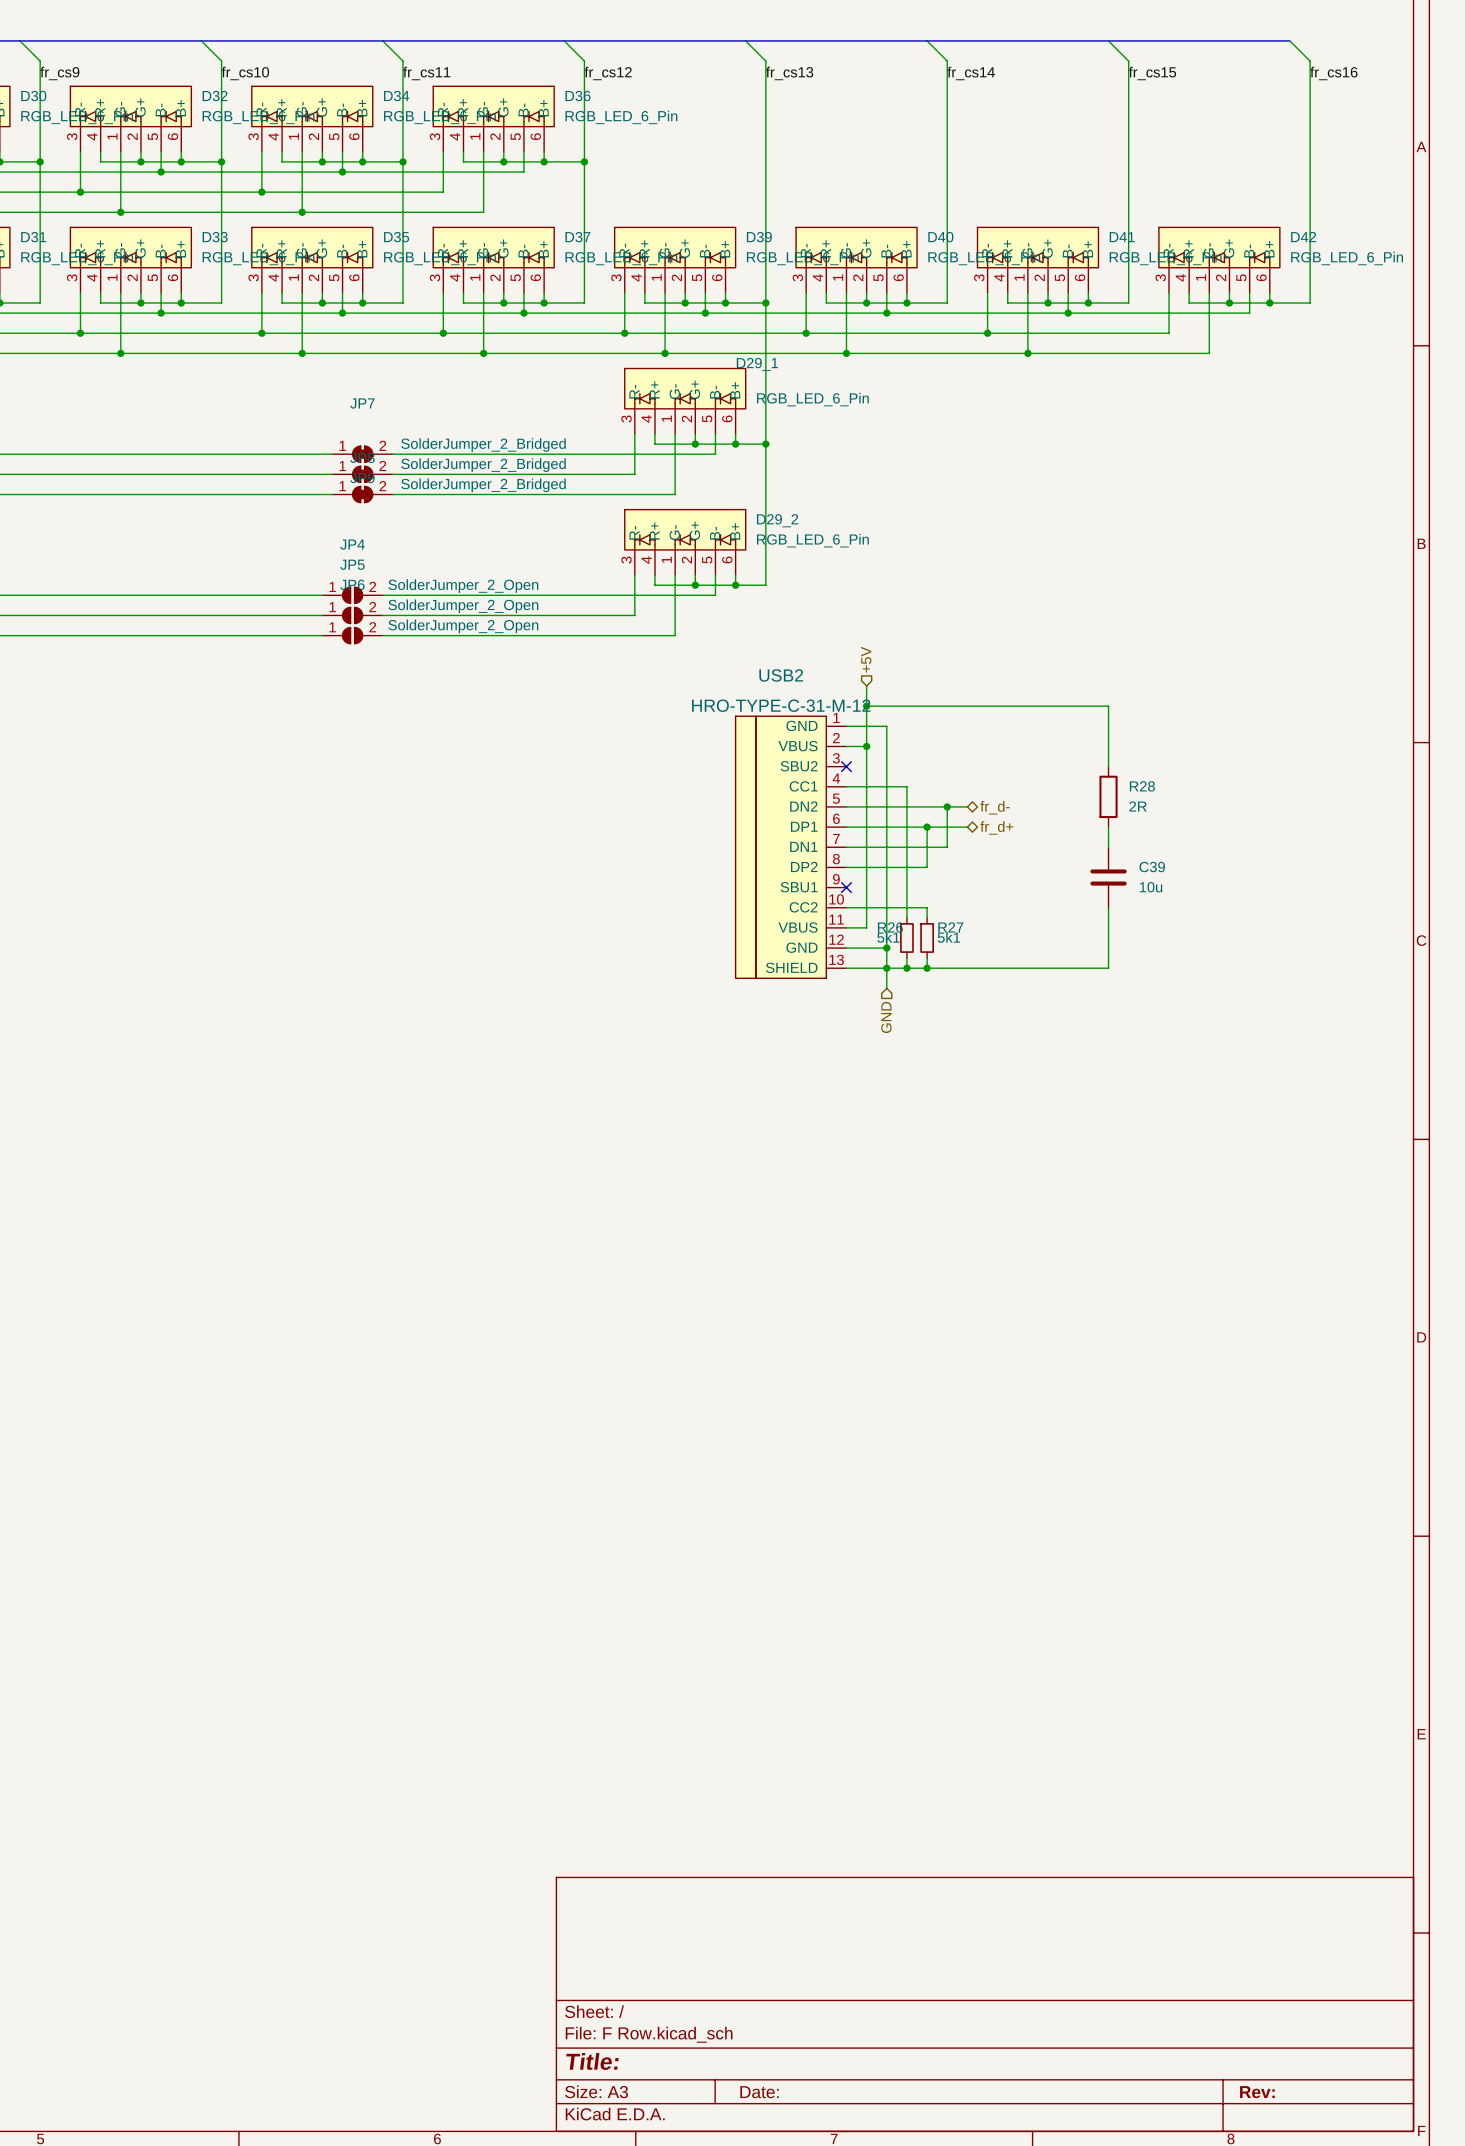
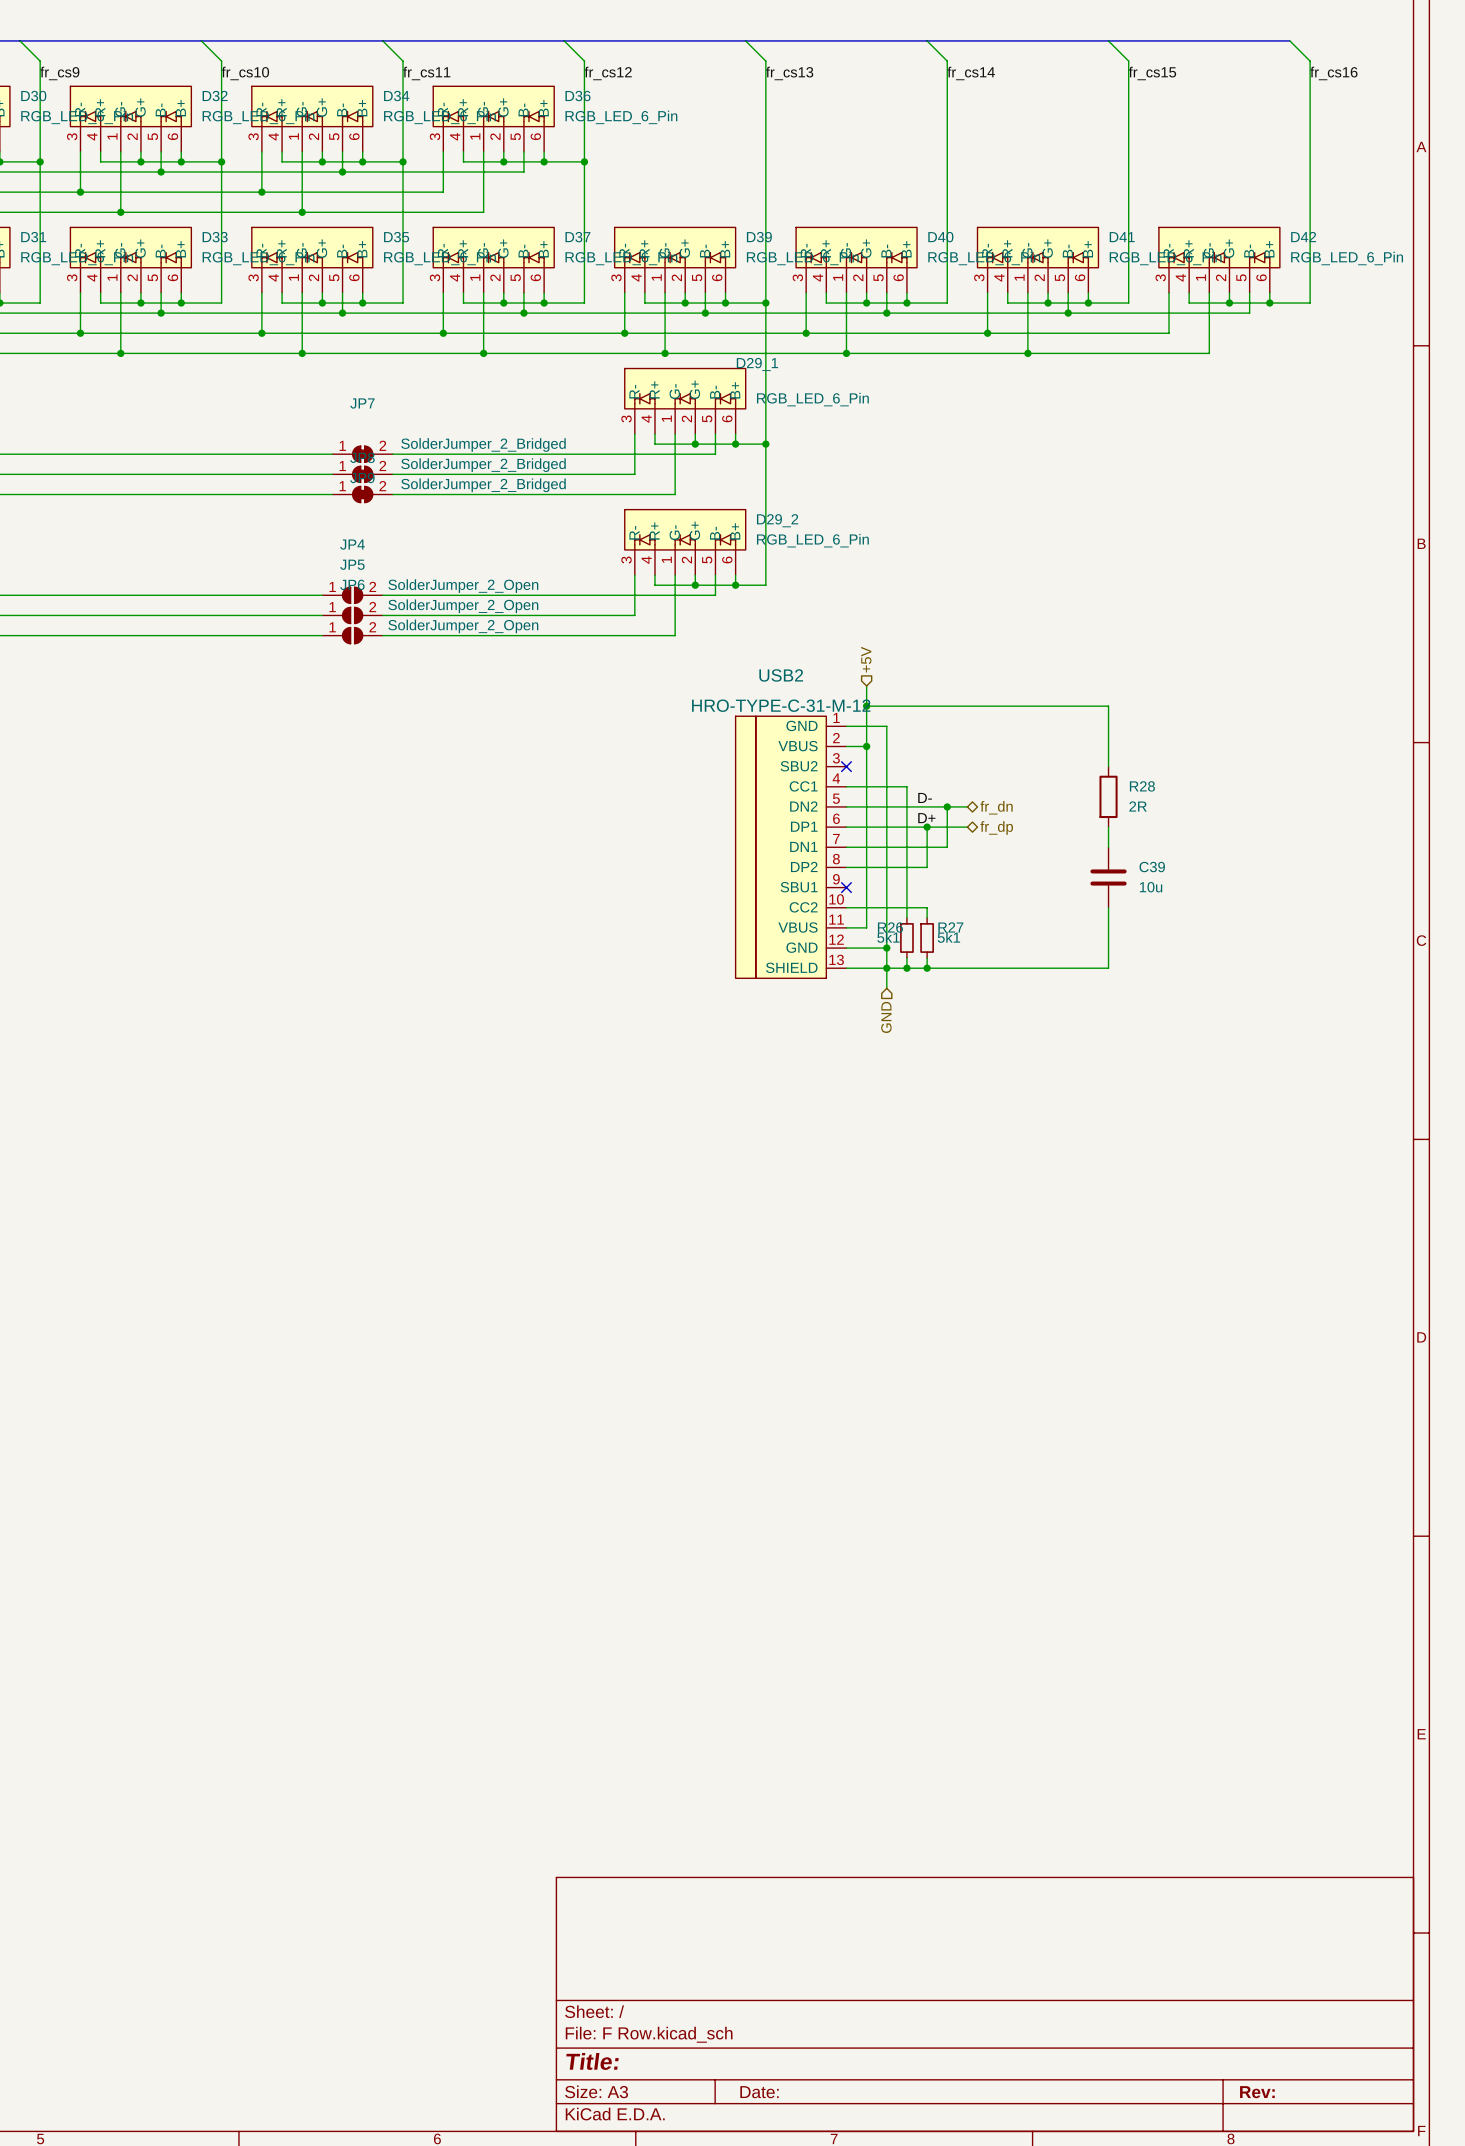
label: none -> D- (925, 797)
hierarchical label: fr_d- (995, 807) -> fr_dn (996, 807)
label: none -> D+ (926, 818)
hierarchical label: fr_d+ (996, 827) -> fr_dp (996, 827)

